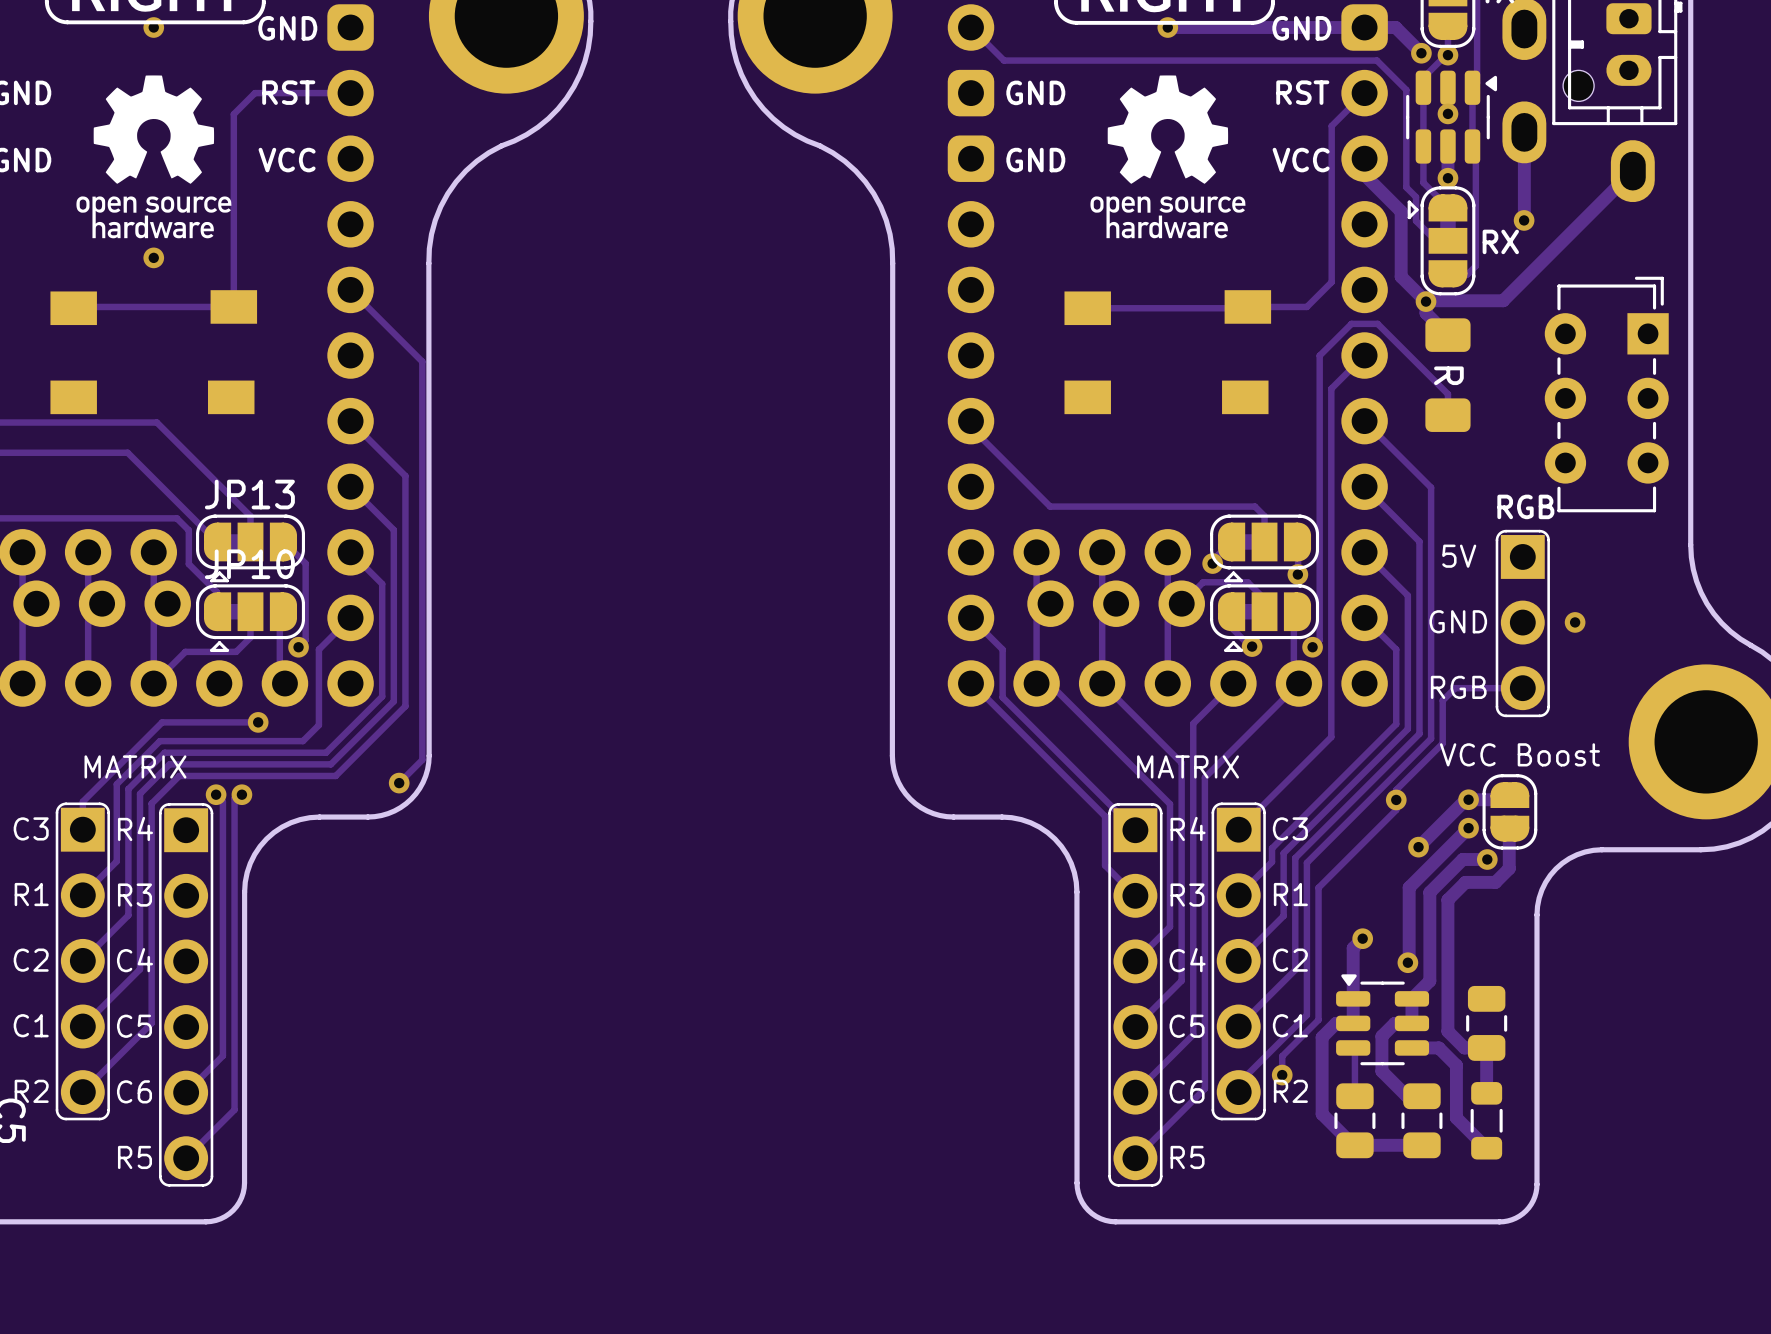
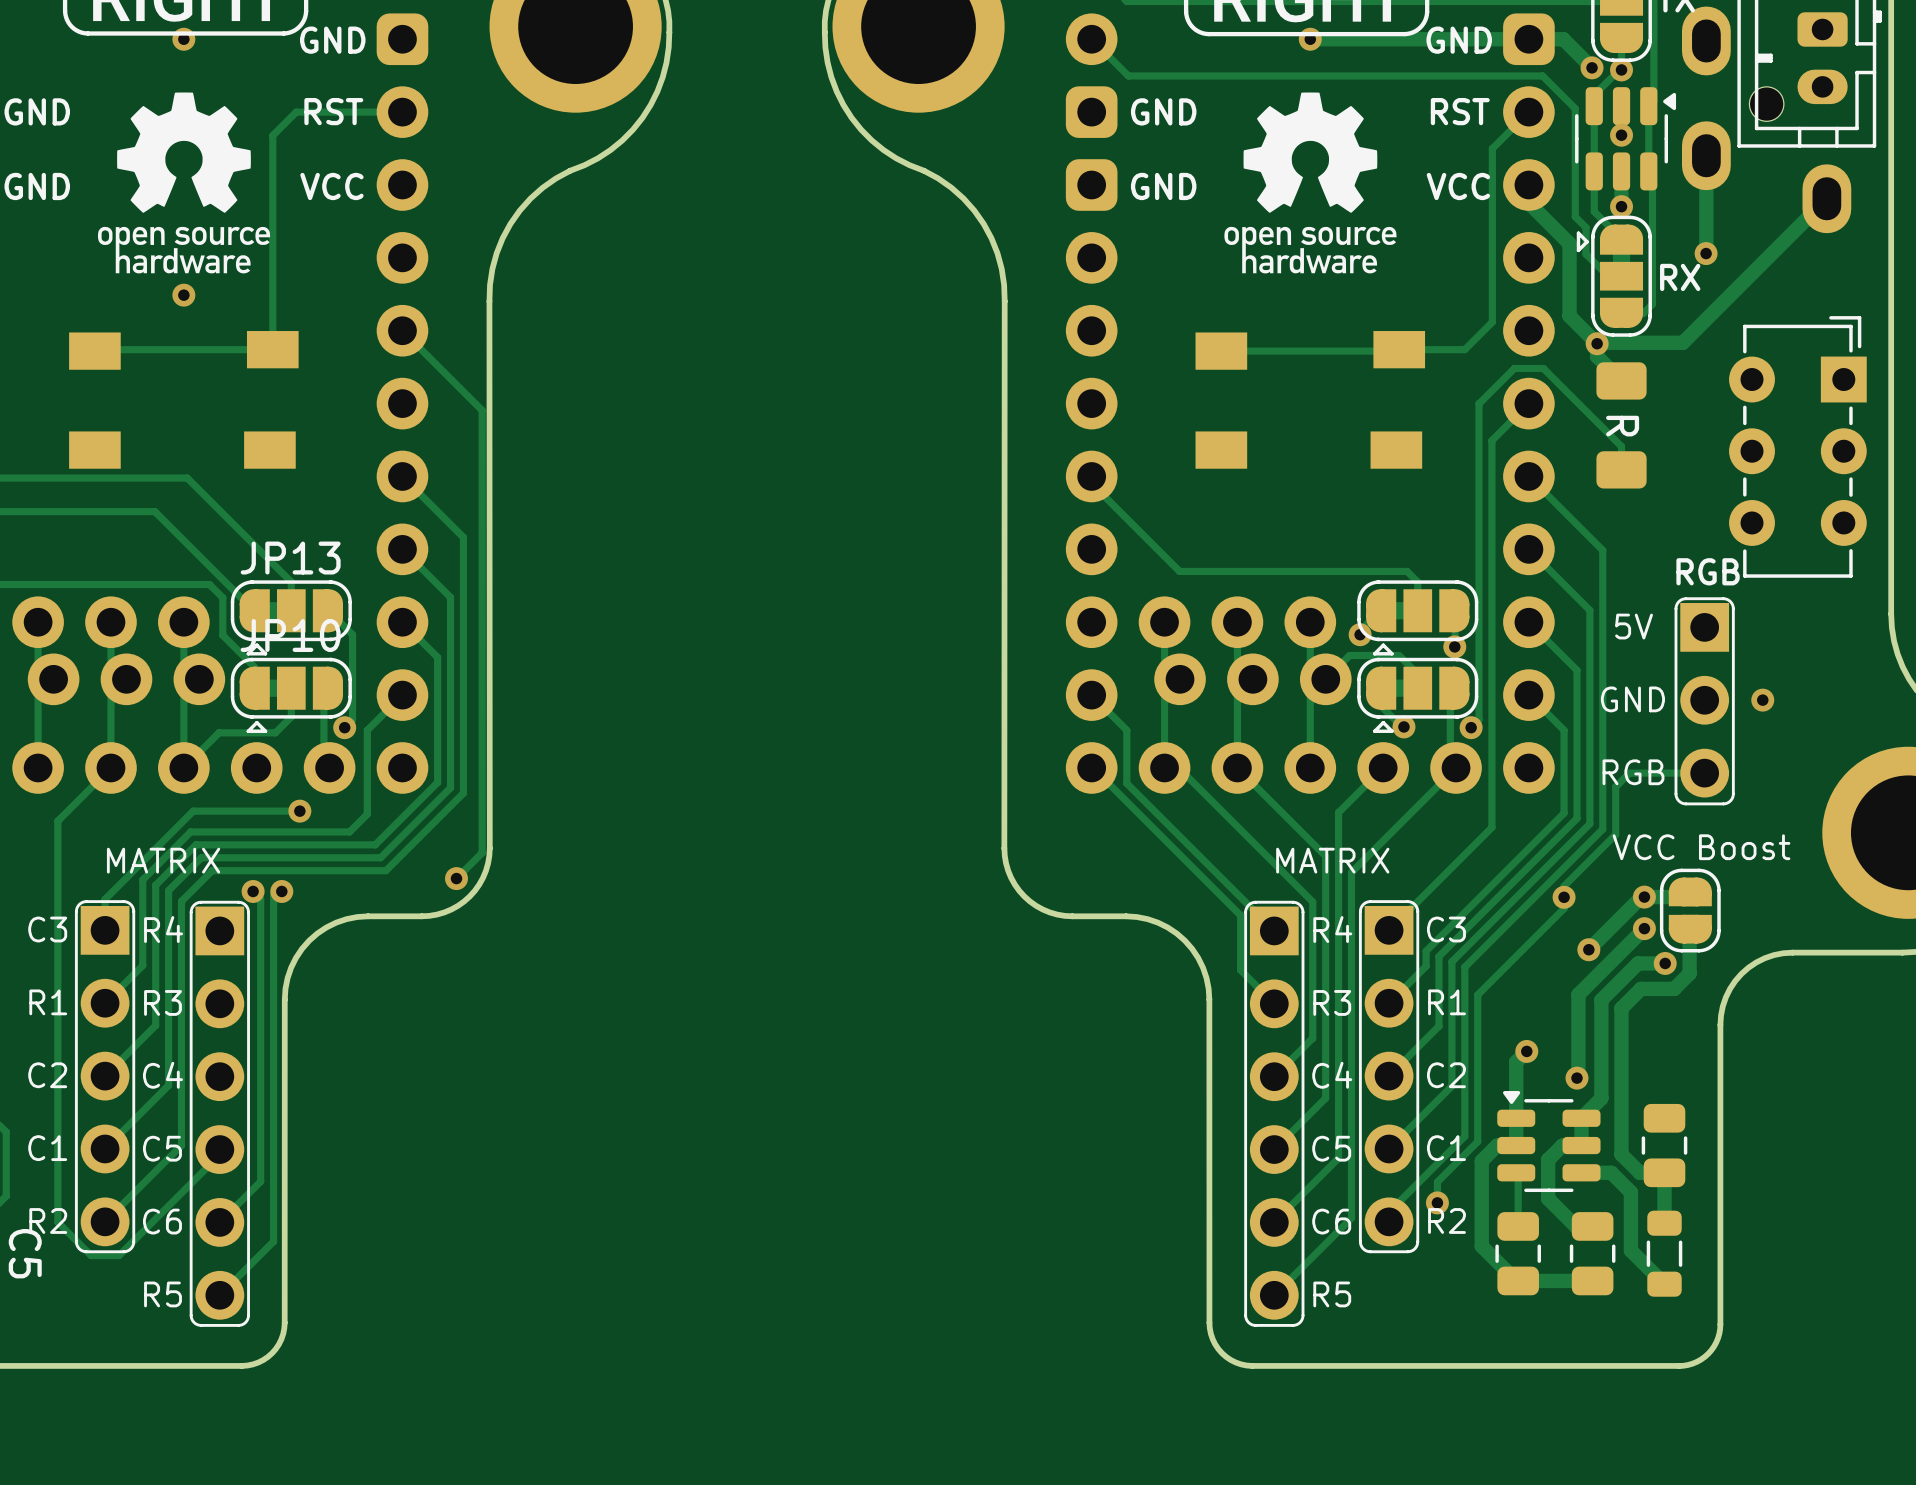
track: none -> (110, 767) (57, 821) (57, 1222) (91, 1255) (119, 1255) (219, 1154)

